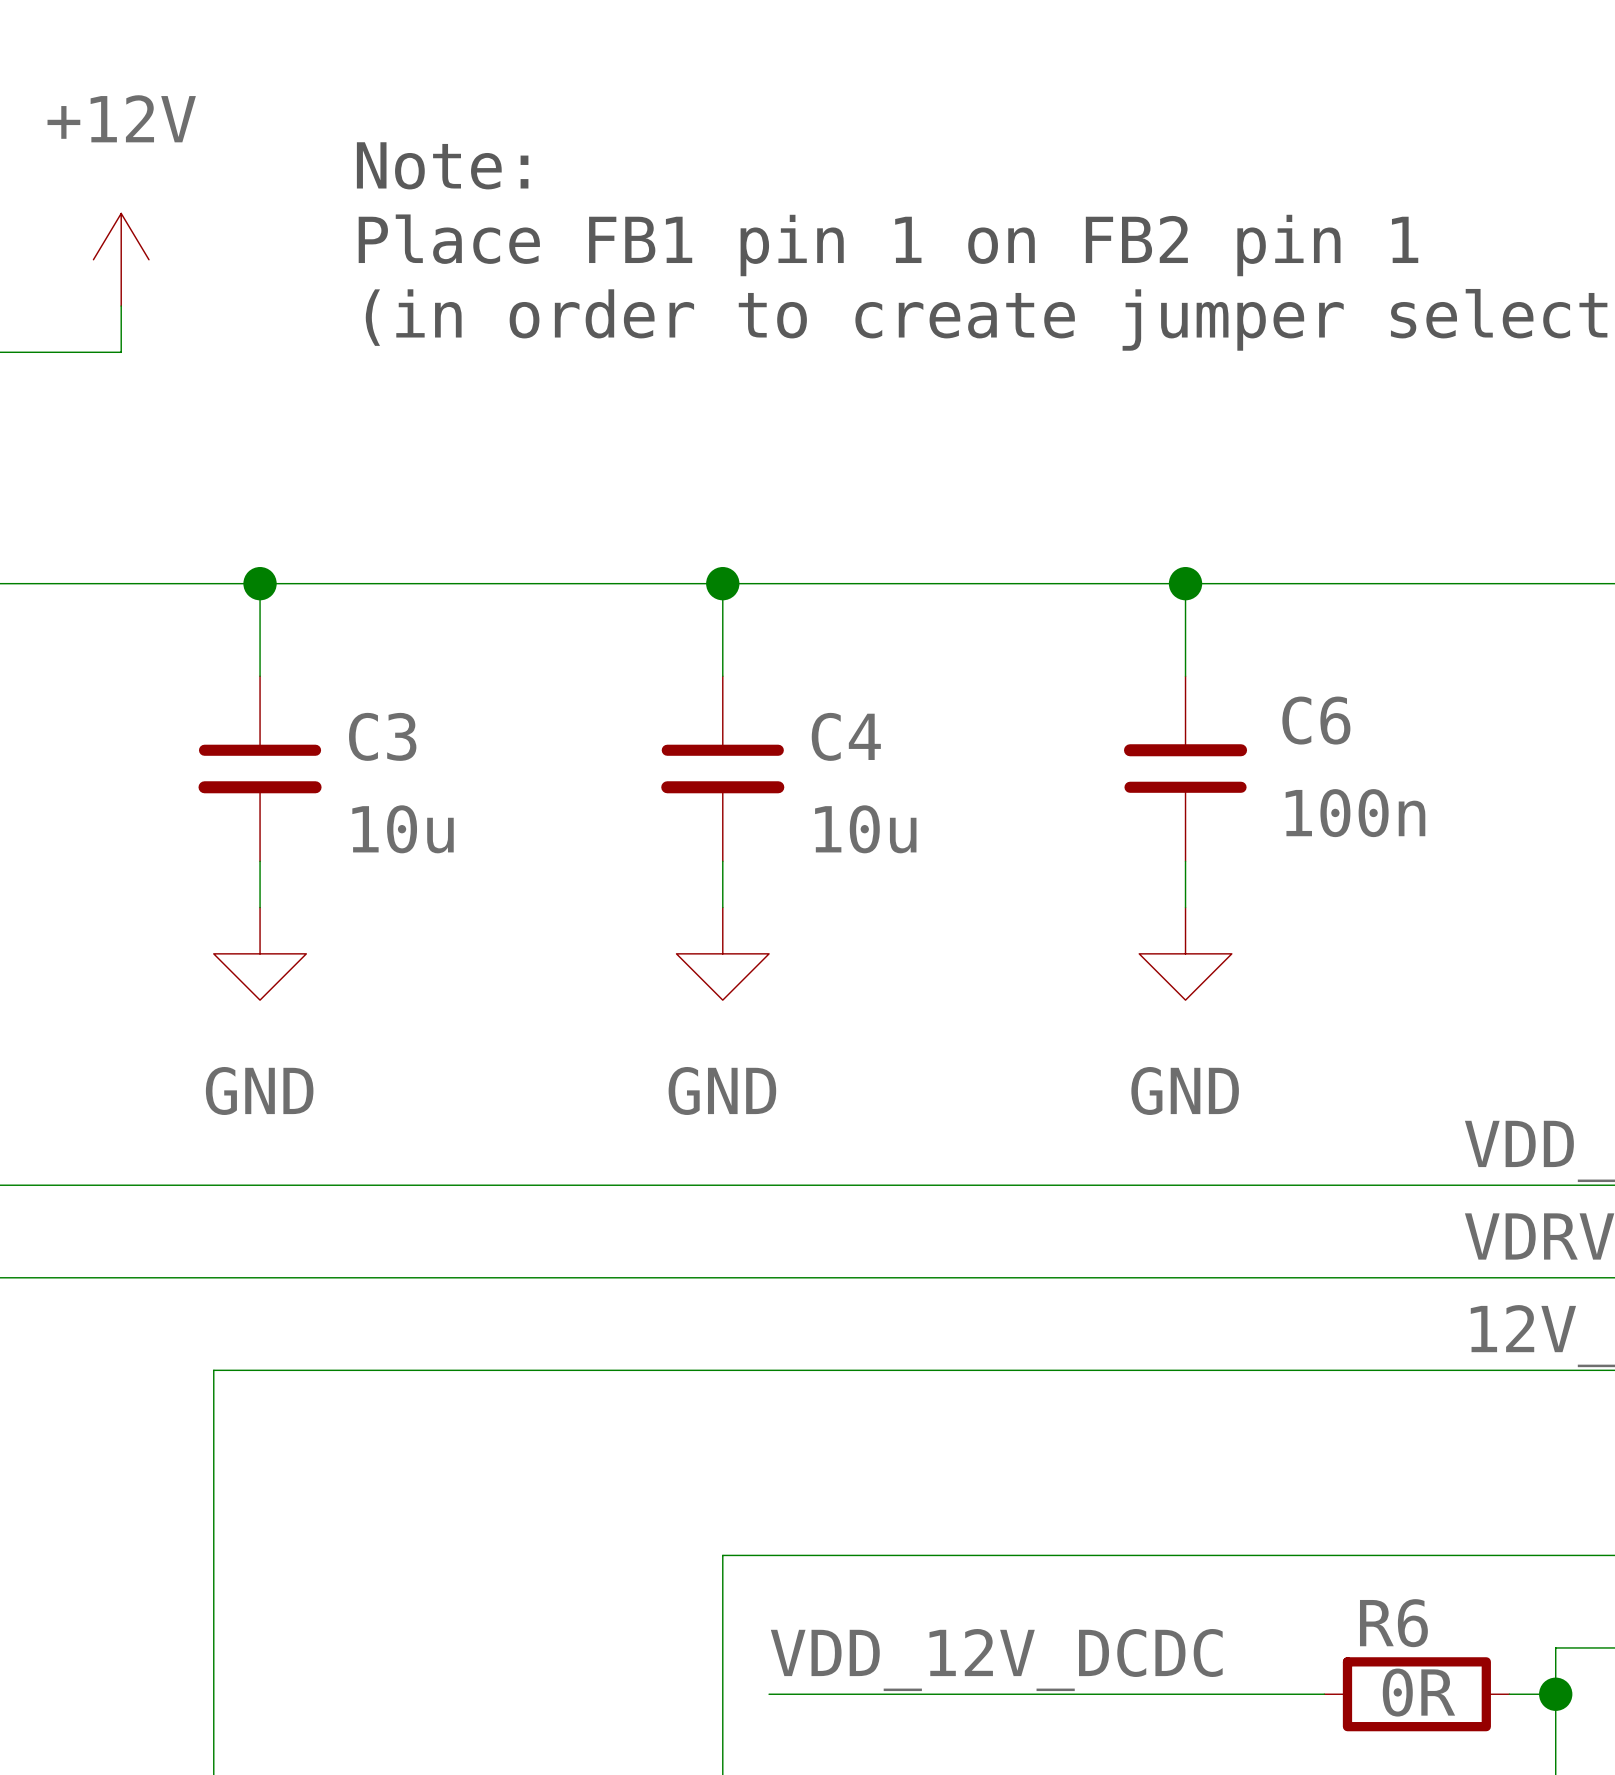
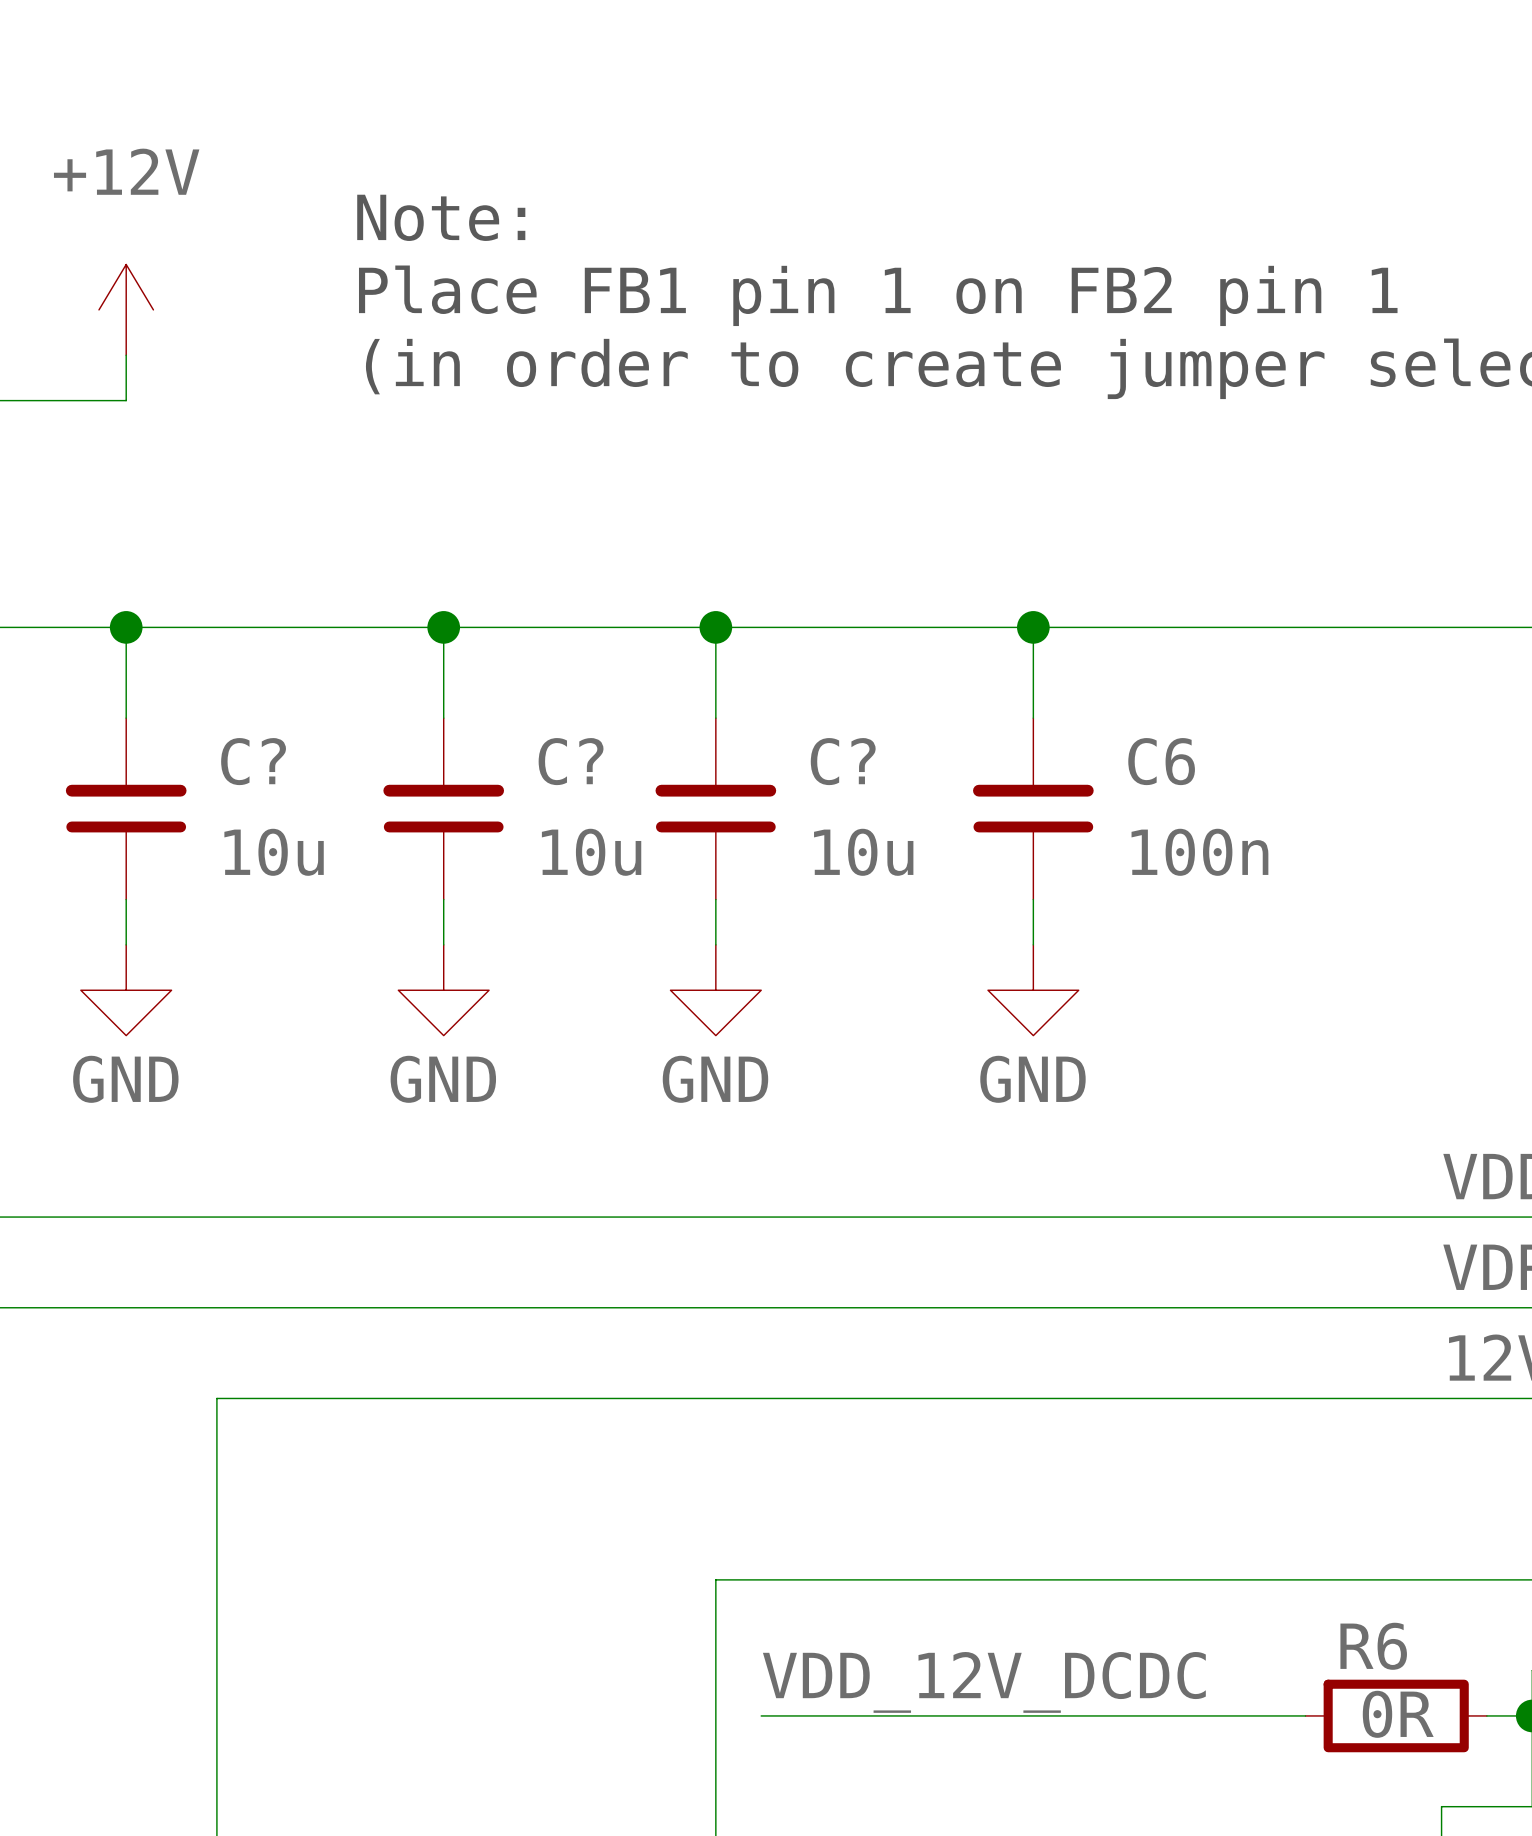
junction: none -> (126, 627)
wire: (260, 583) (260, 676) -> (126, 627) (126, 718)
junction: (260, 583) -> none
wire: none -> (443, 627) (443, 718)
junction: none -> (443, 627)
wire: (1185, 583) (1185, 676) -> (1033, 627) (1033, 718)
junction position: (1185, 583) -> (1033, 627)
C?: none -> (126, 808)
C3: (260, 768) -> none
C?: none -> (443, 808)
C4: (722, 768) -> none
C?: none -> (715, 808)
C6 position: (1185, 768) -> (1033, 808)
wire: (260, 861) (260, 907) -> (126, 899) (126, 944)
wire: none -> (443, 899) (443, 944)
wire: (1185, 861) (1185, 907) -> (1033, 899) (1033, 944)
power symbol: none -> GND (126, 990)
power symbol: GND (260, 953) -> none
power symbol: none -> GND (443, 990)
power symbol position: GND (1185, 953) -> GND (1033, 990)
power symbol text position: GND (722, 1090) -> GND (715, 1079)
power symbol text position: GND (1185, 1090) -> GND (1032, 1079)

